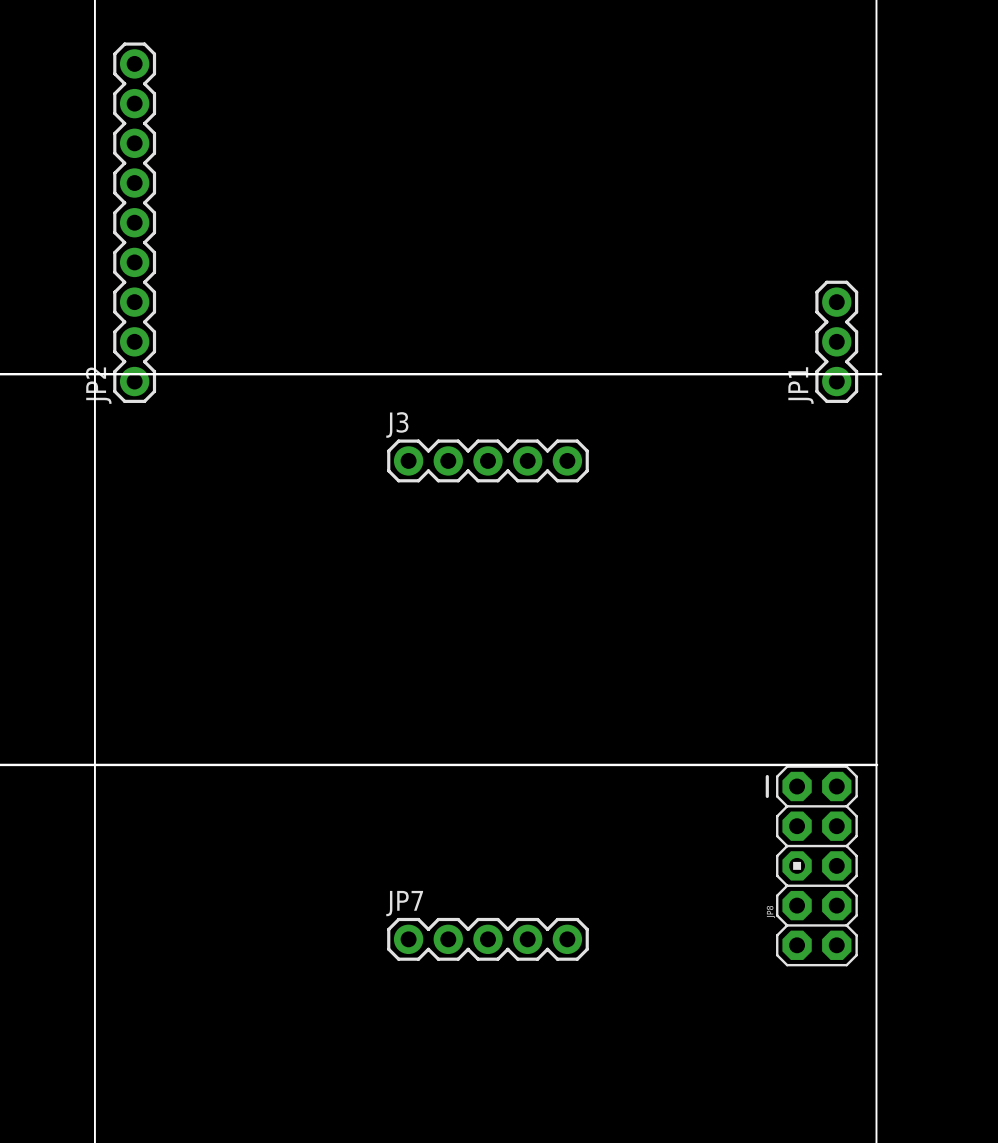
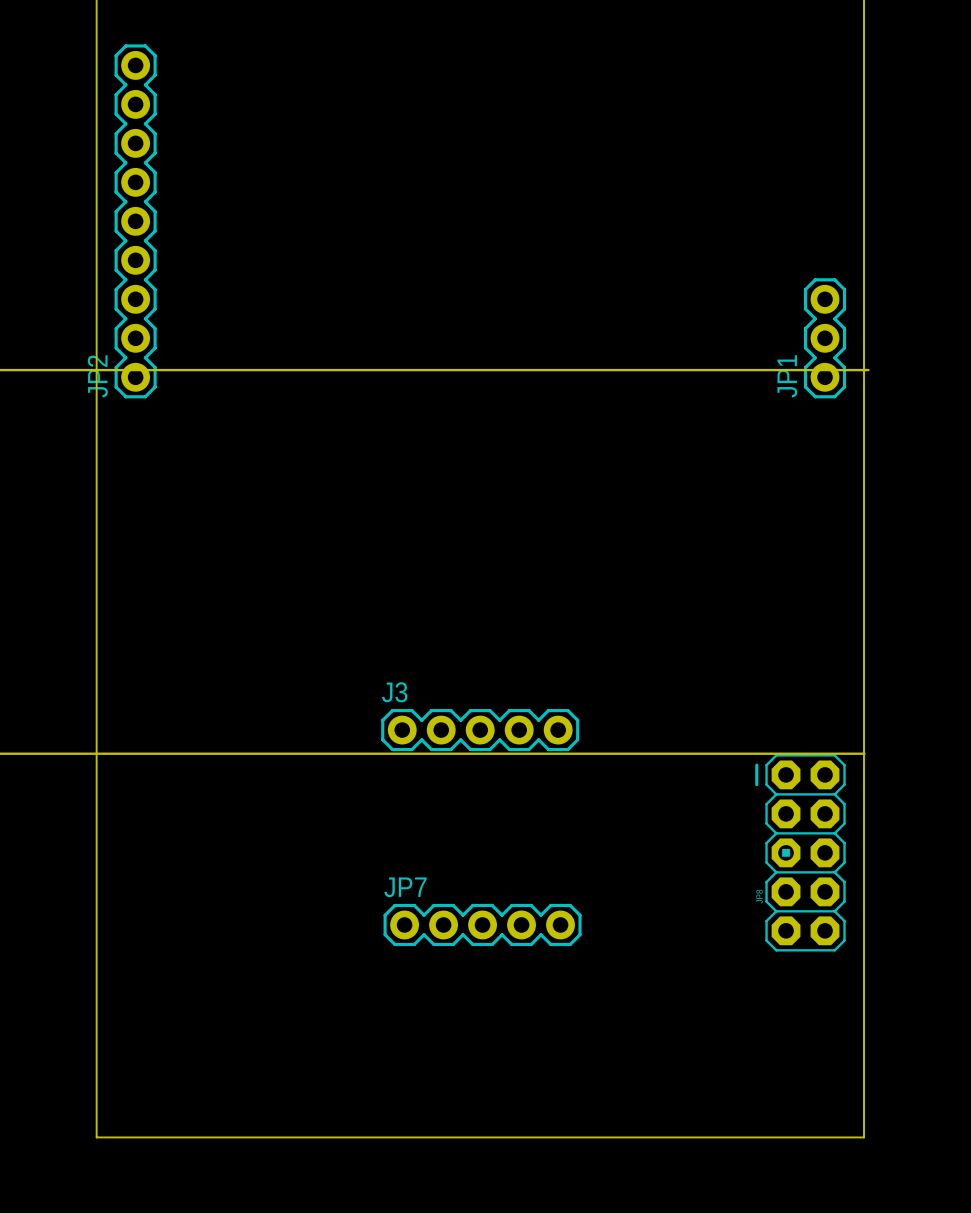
J3 position: (488, 460) -> (480, 730)

